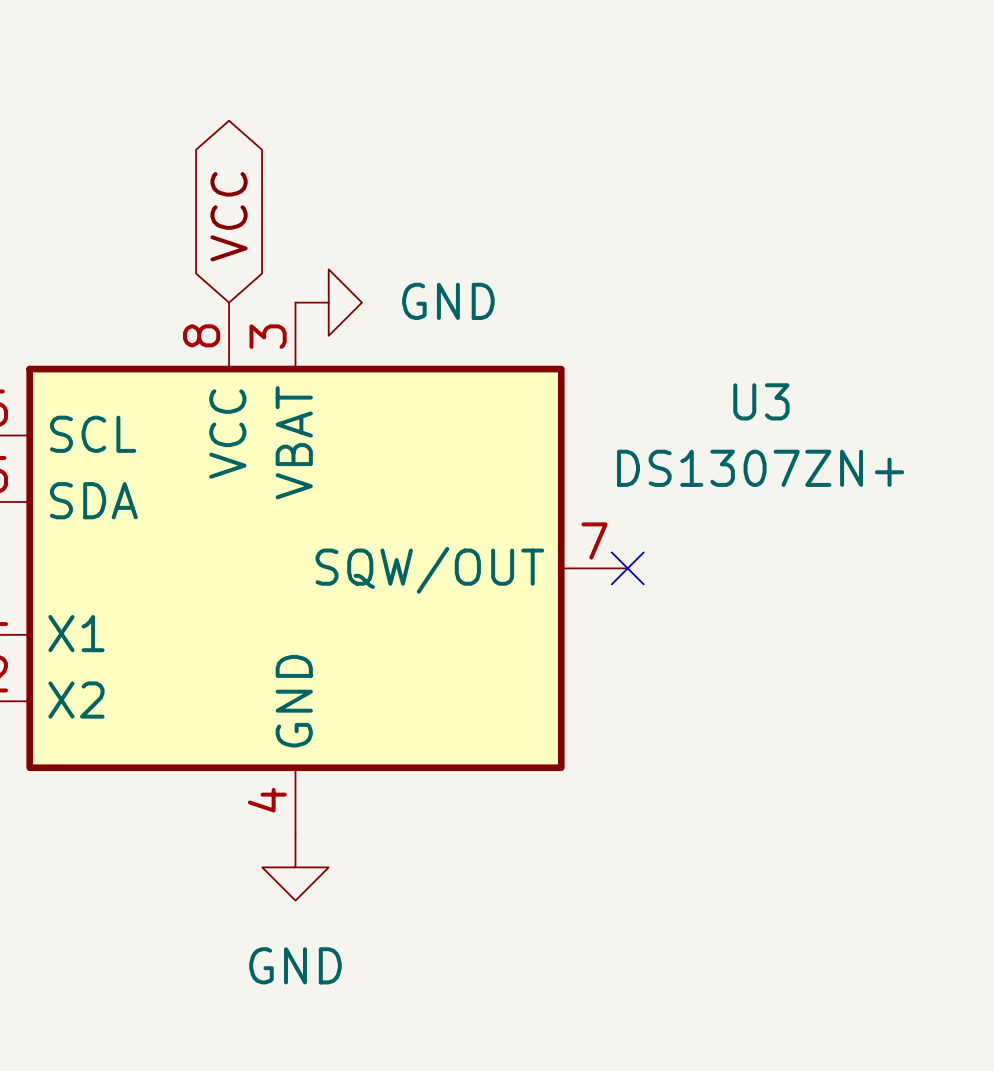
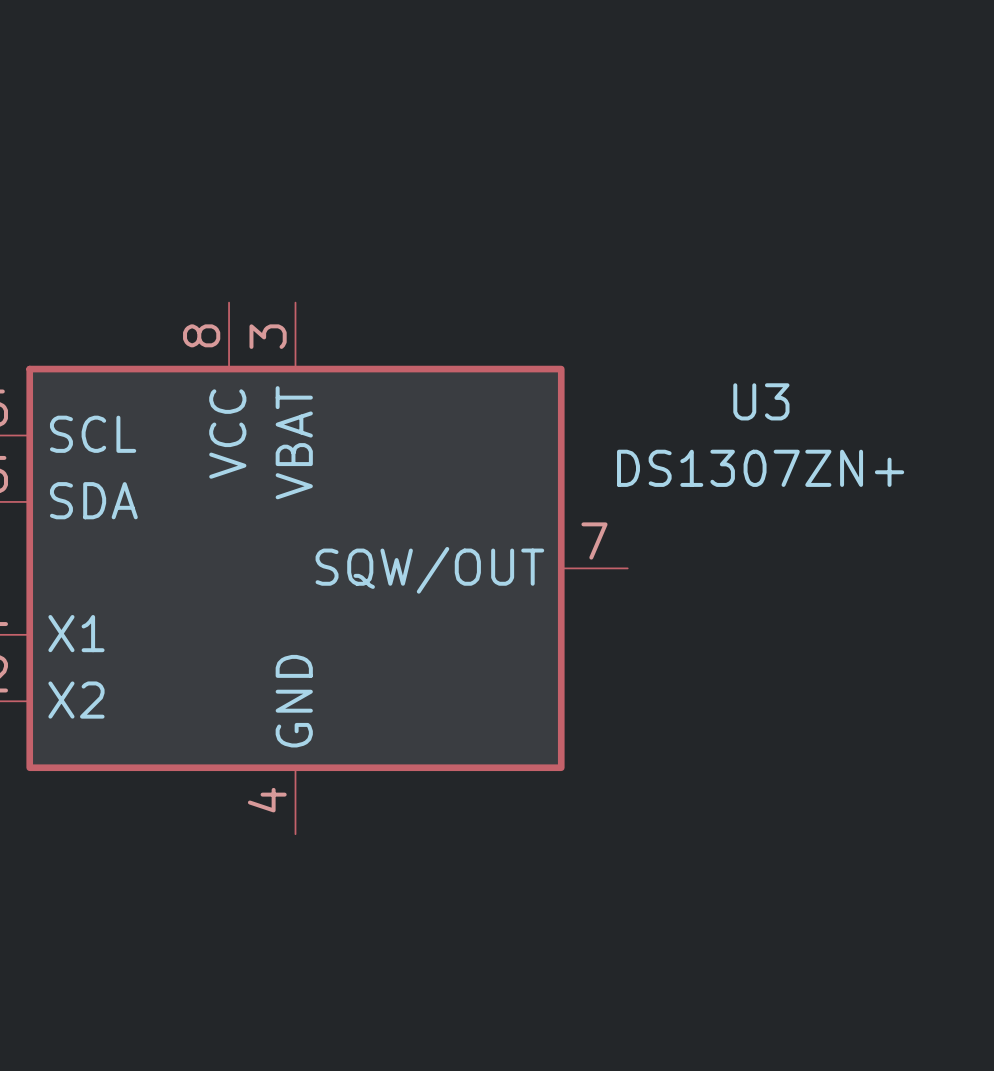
global label: VCC (229, 216) -> none
power symbol: GND (328, 302) -> none
no-connect mark: (627, 568) -> none
power symbol: GND (295, 867) -> none

